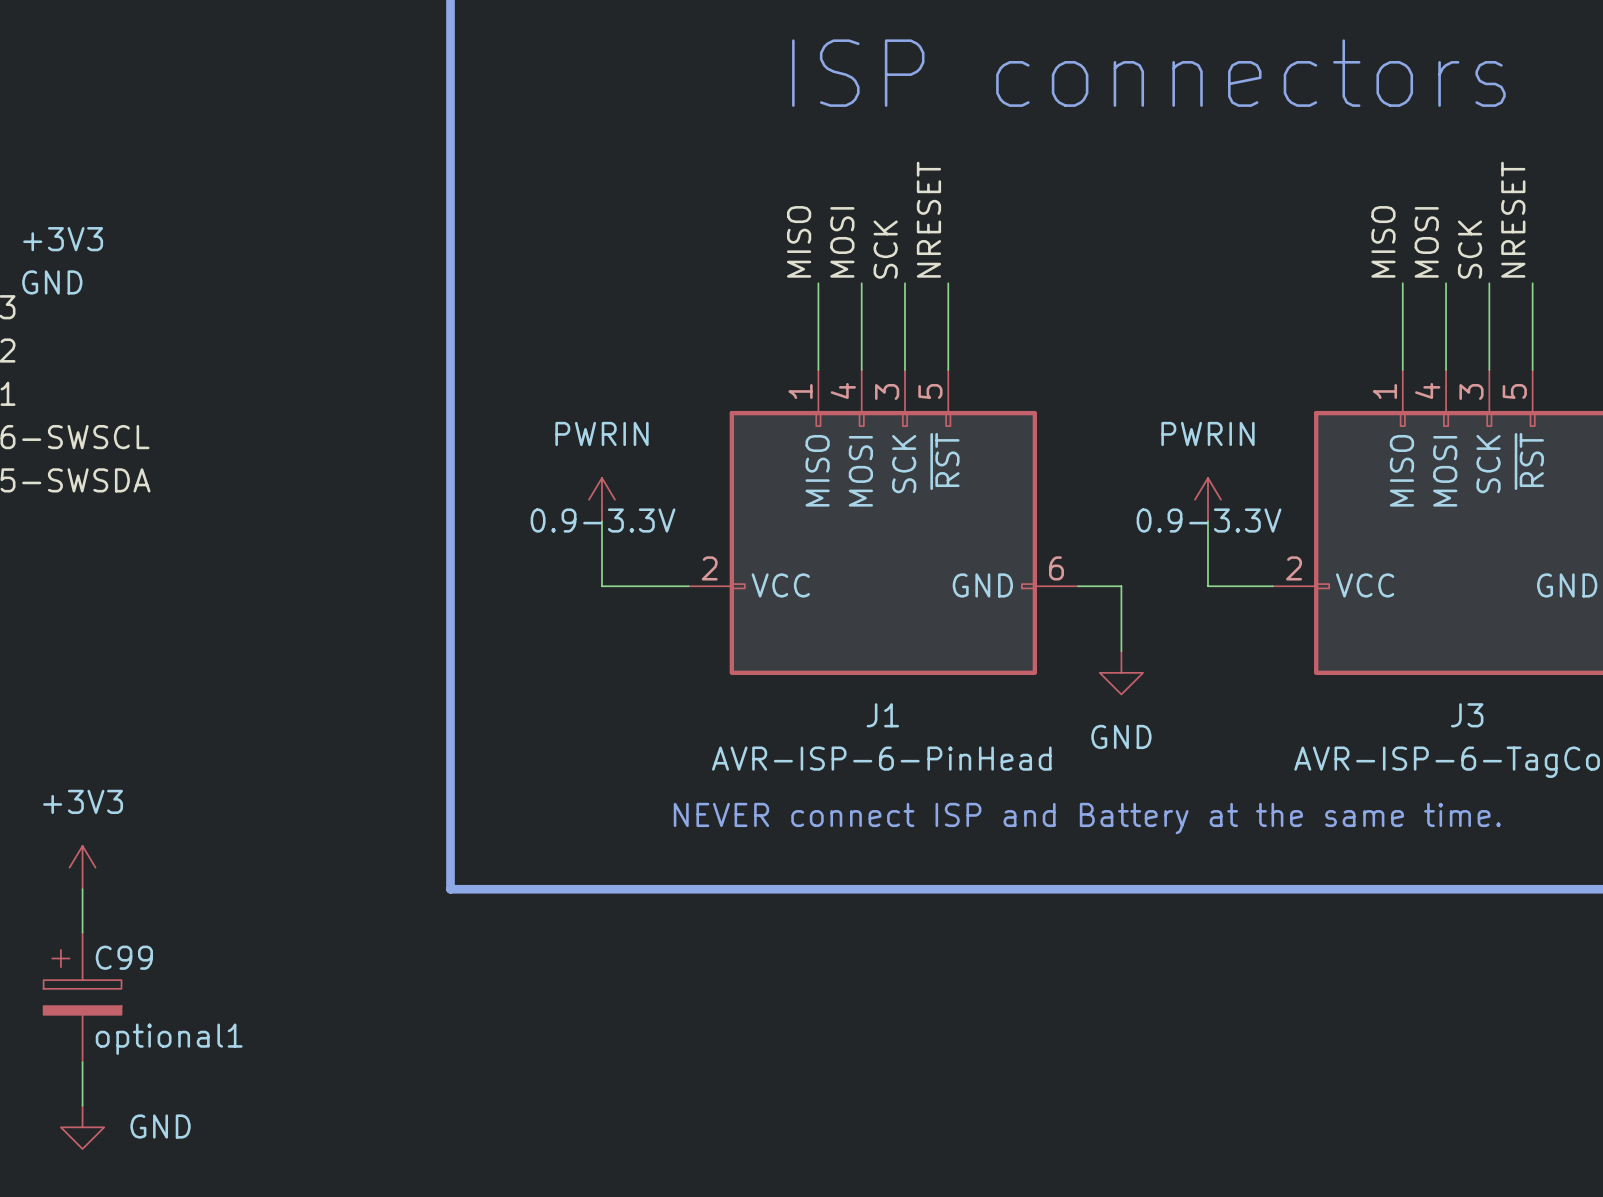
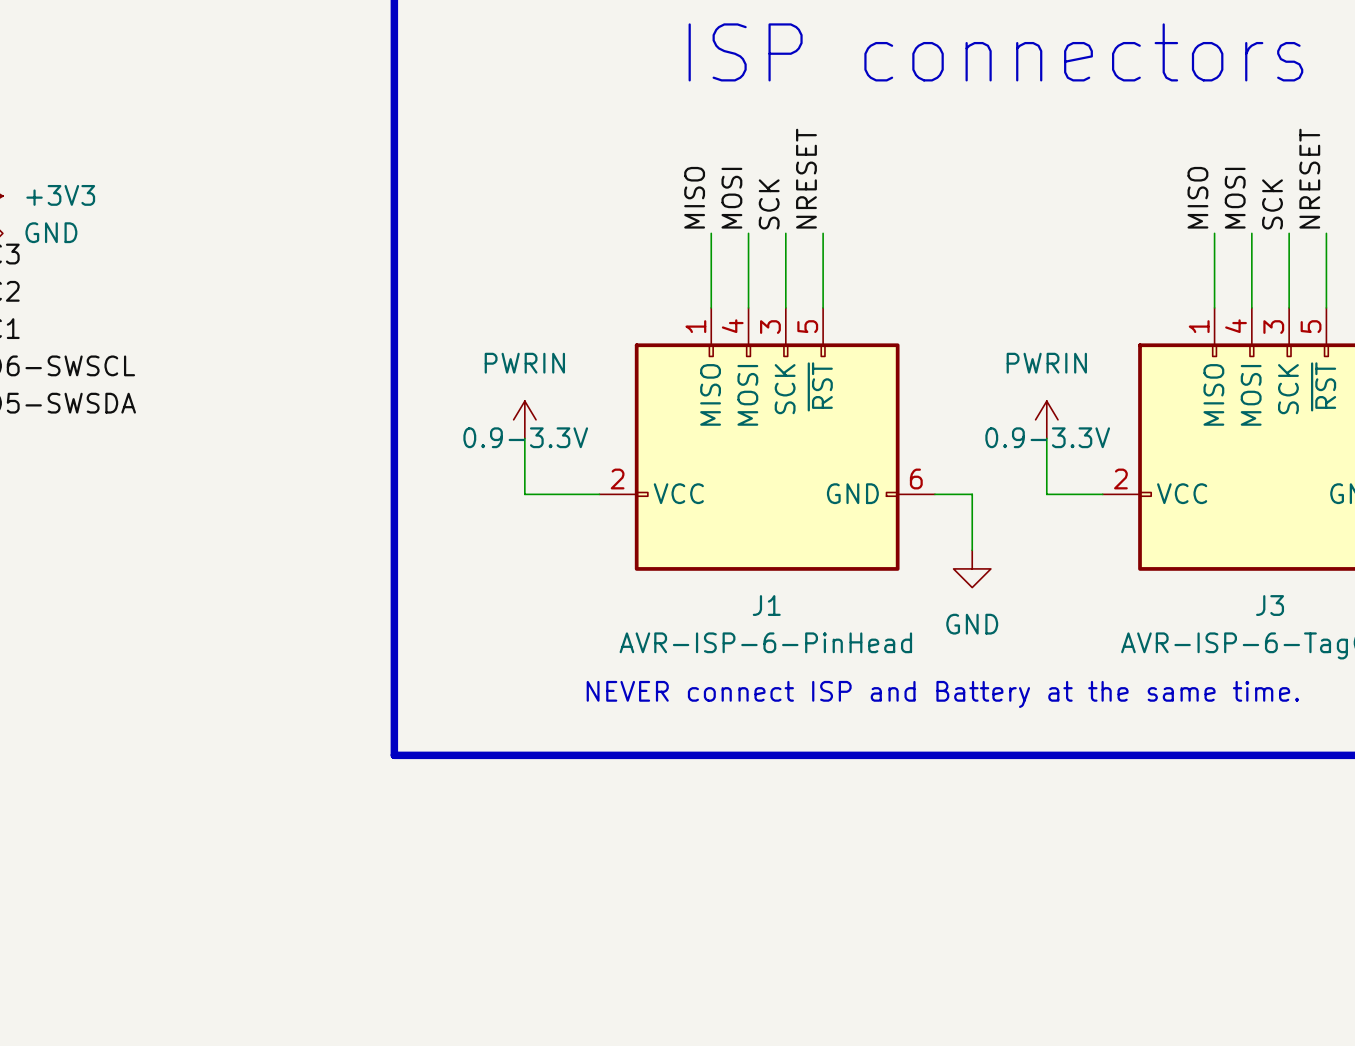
power symbol: +3V3 (82, 867) -> none
wire: (82, 889) (82, 932) -> none
C99: optional1 (82, 997) -> none
wire: (82, 1062) (82, 1105) -> none
power symbol: GND (82, 1127) -> none

